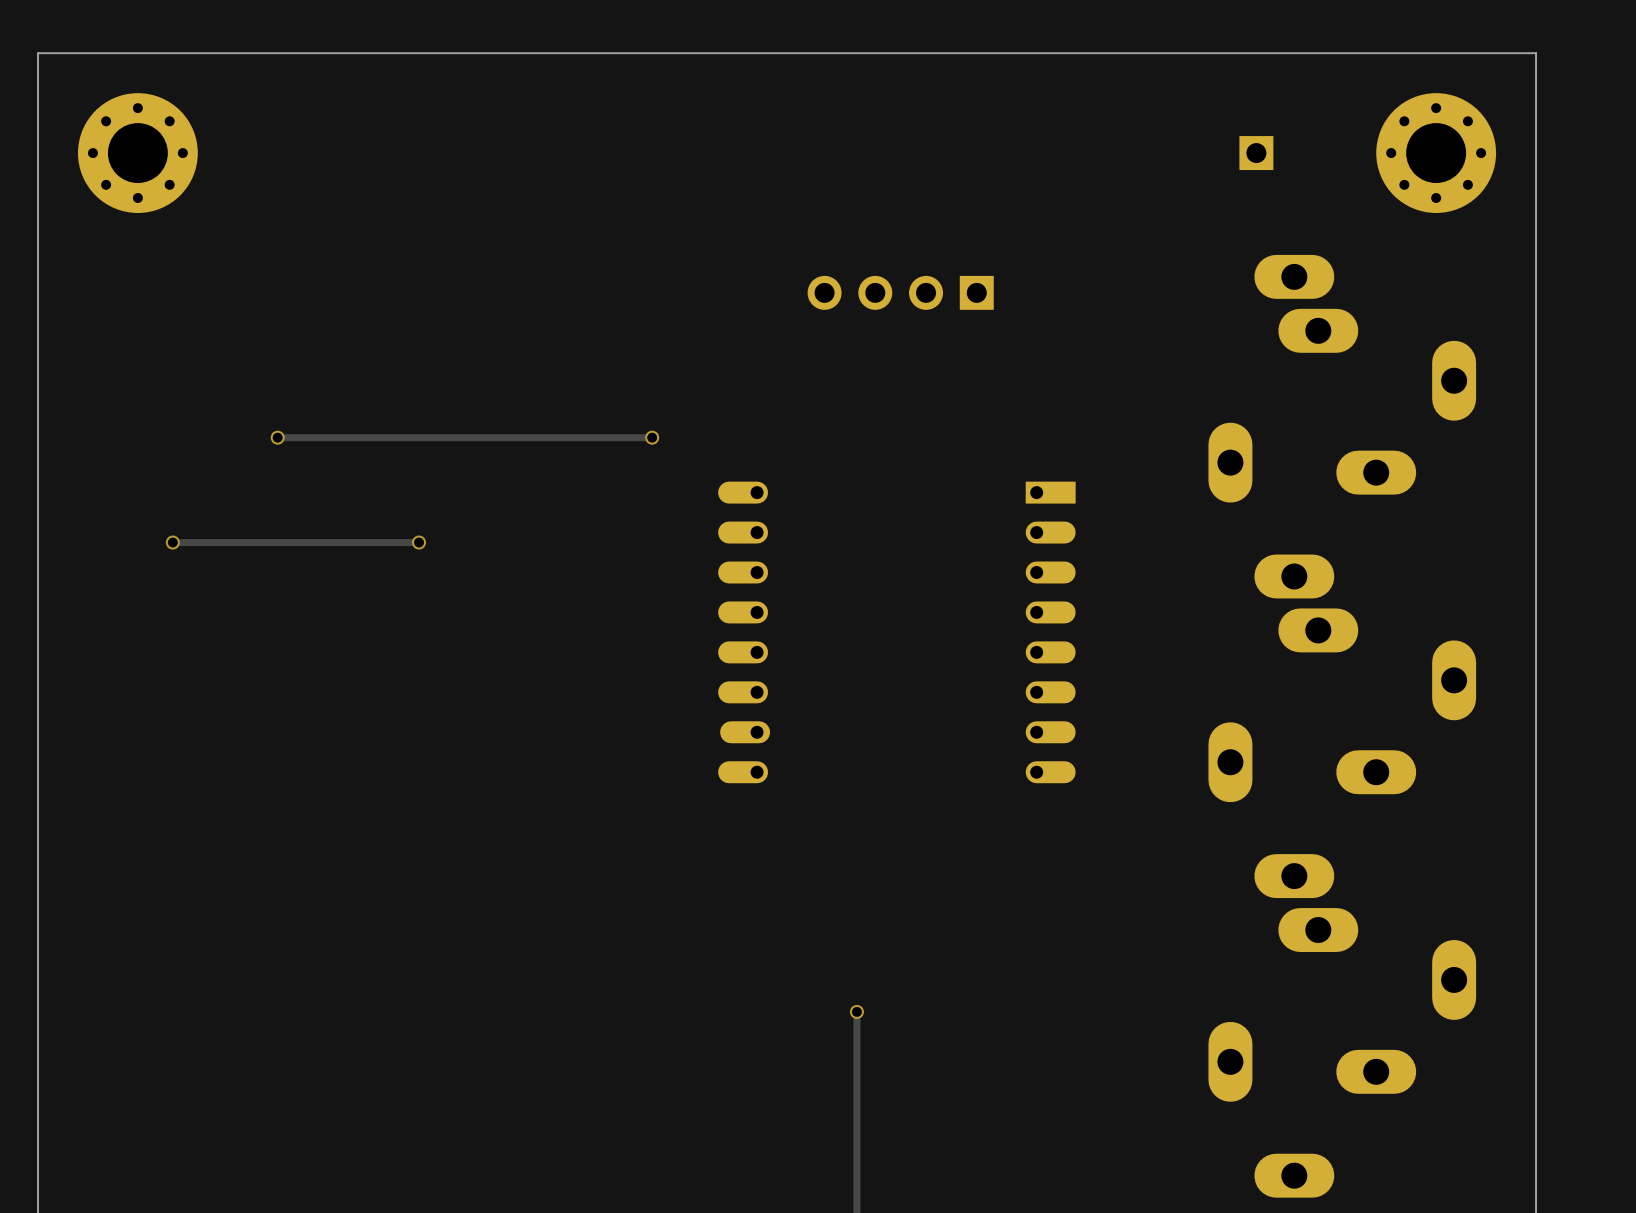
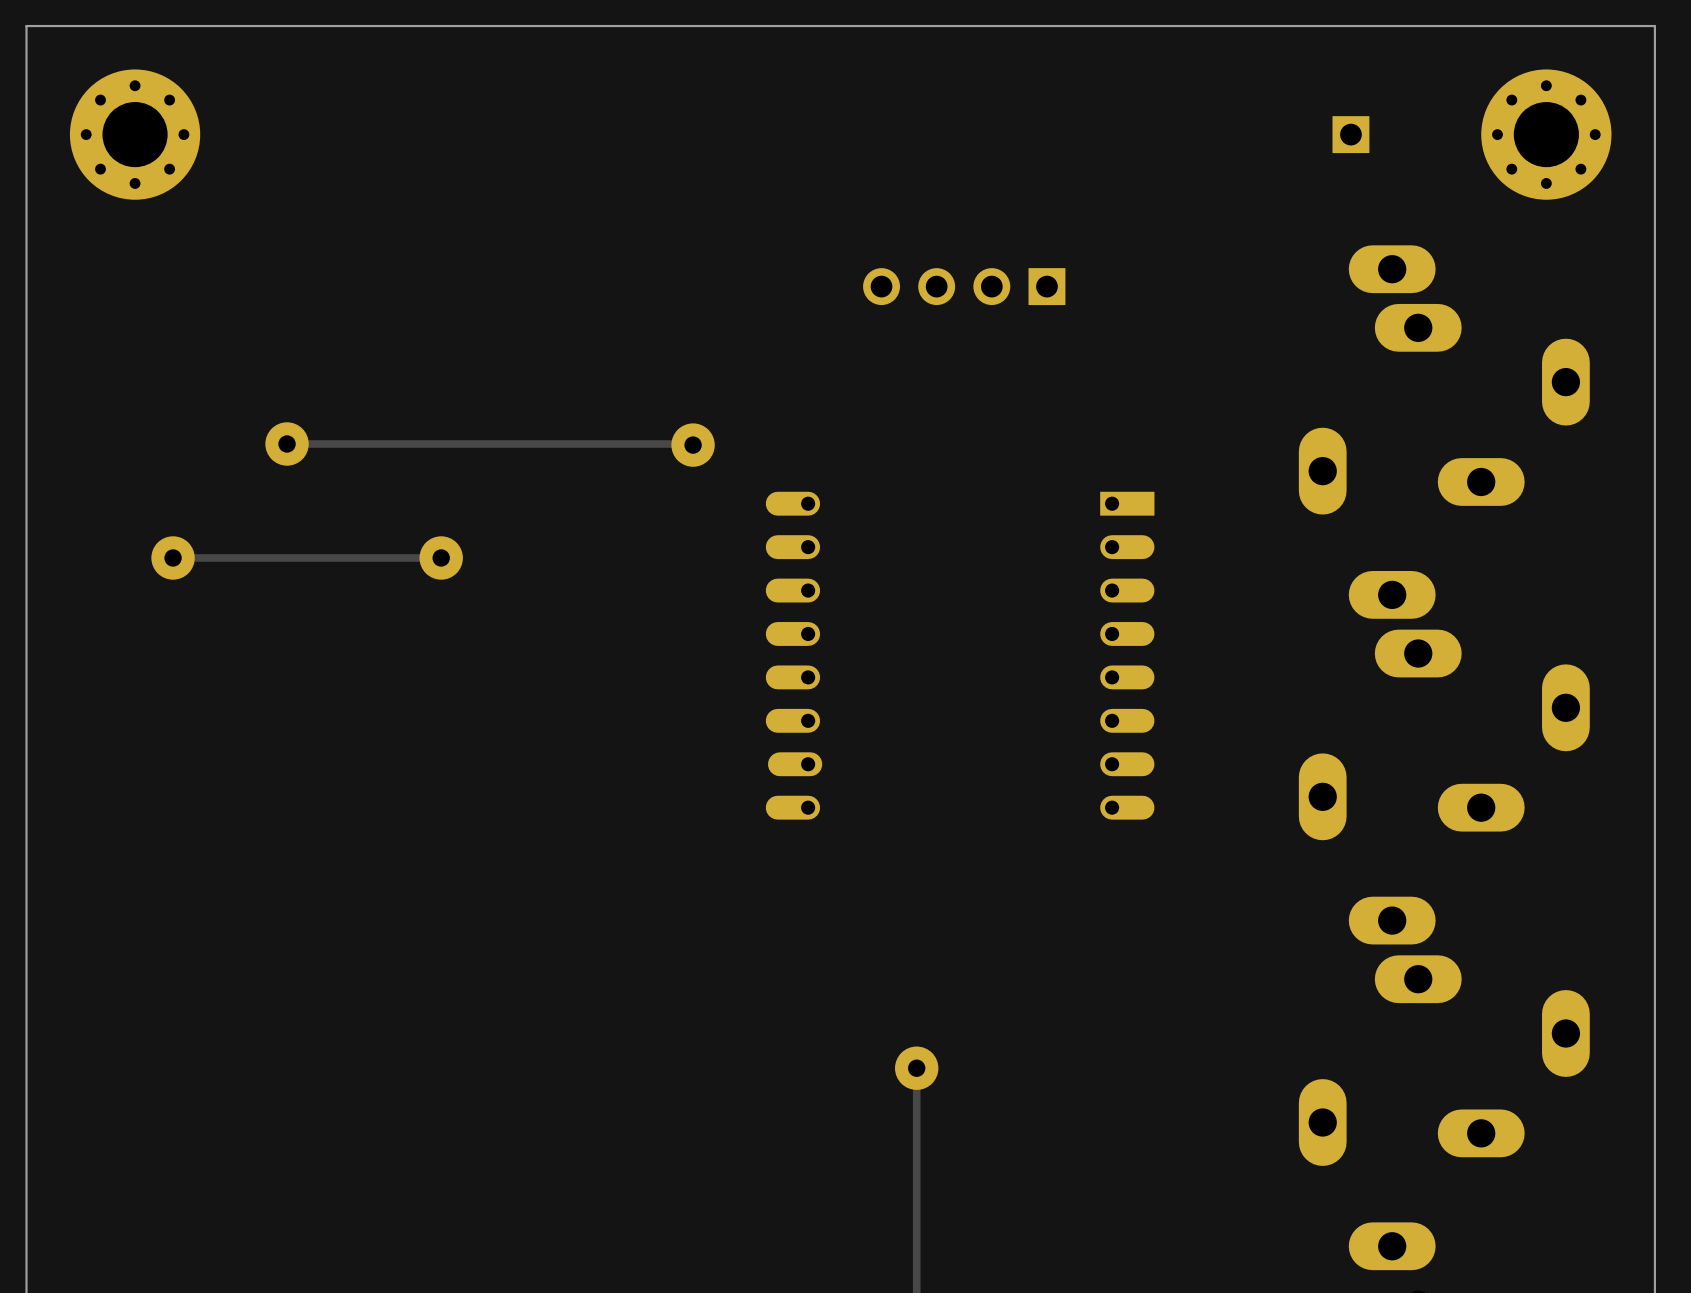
part: none -> (287, 443)
part: none -> (693, 445)
part: none -> (173, 557)
part: none -> (441, 557)
part: none -> (916, 1068)

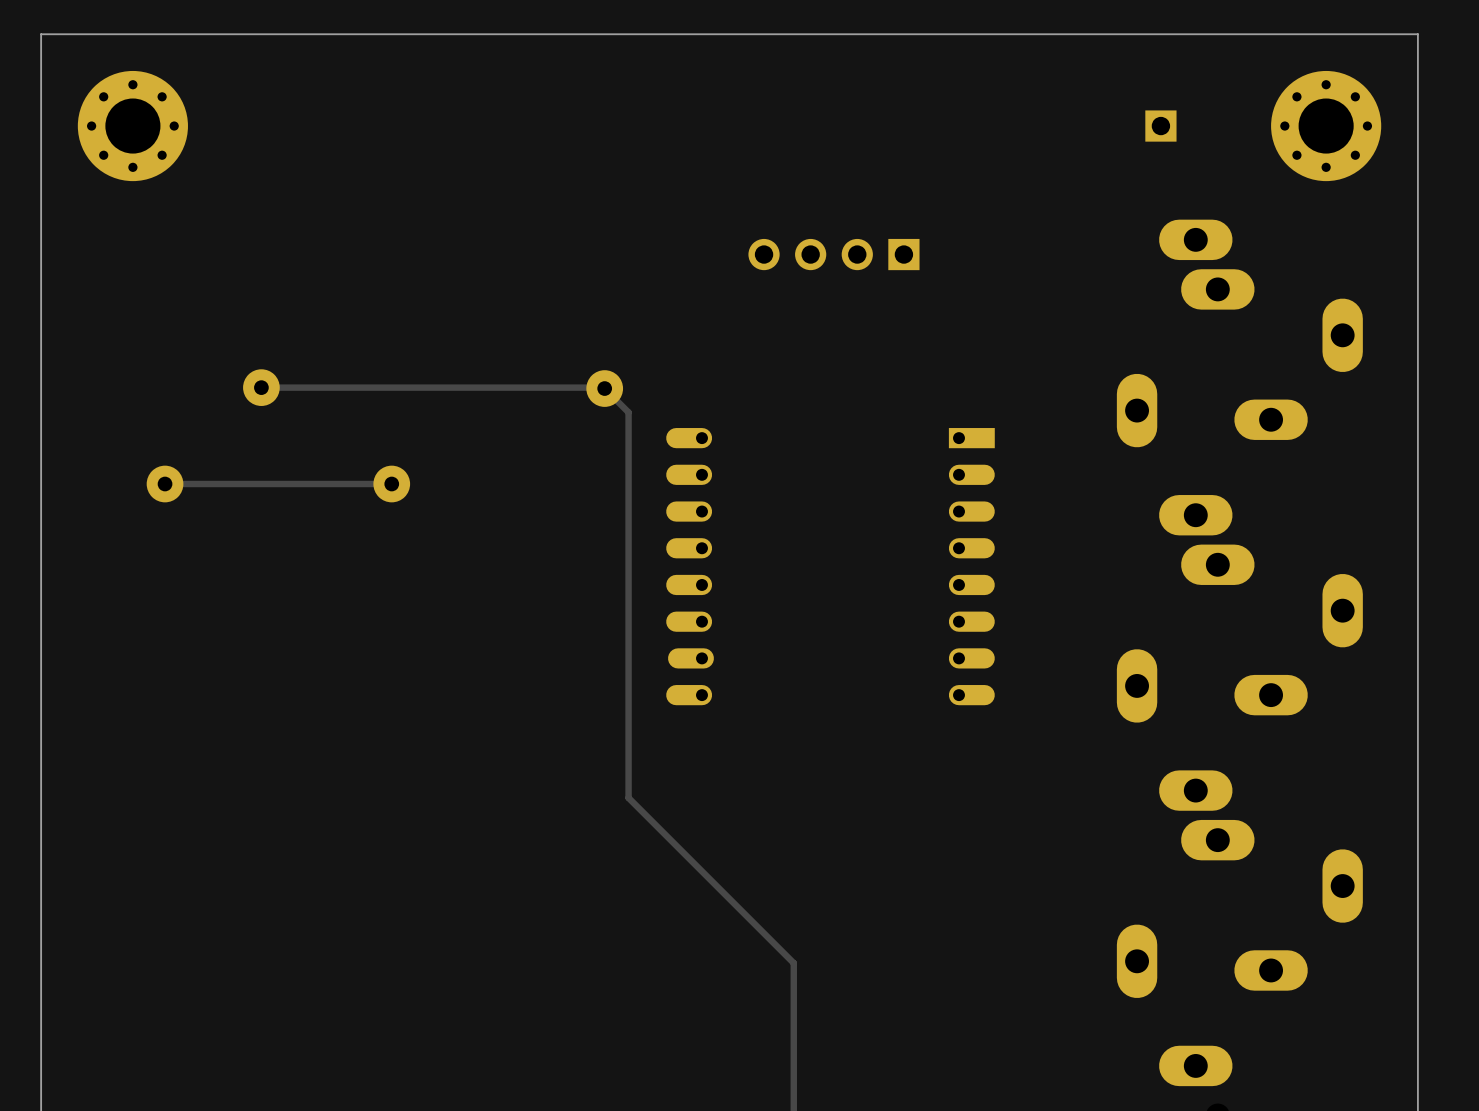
track: (916, 1068) (916, 1124) -> (604, 388) (628, 412) (628, 797) (793, 963)
part: (916, 1068) -> none

